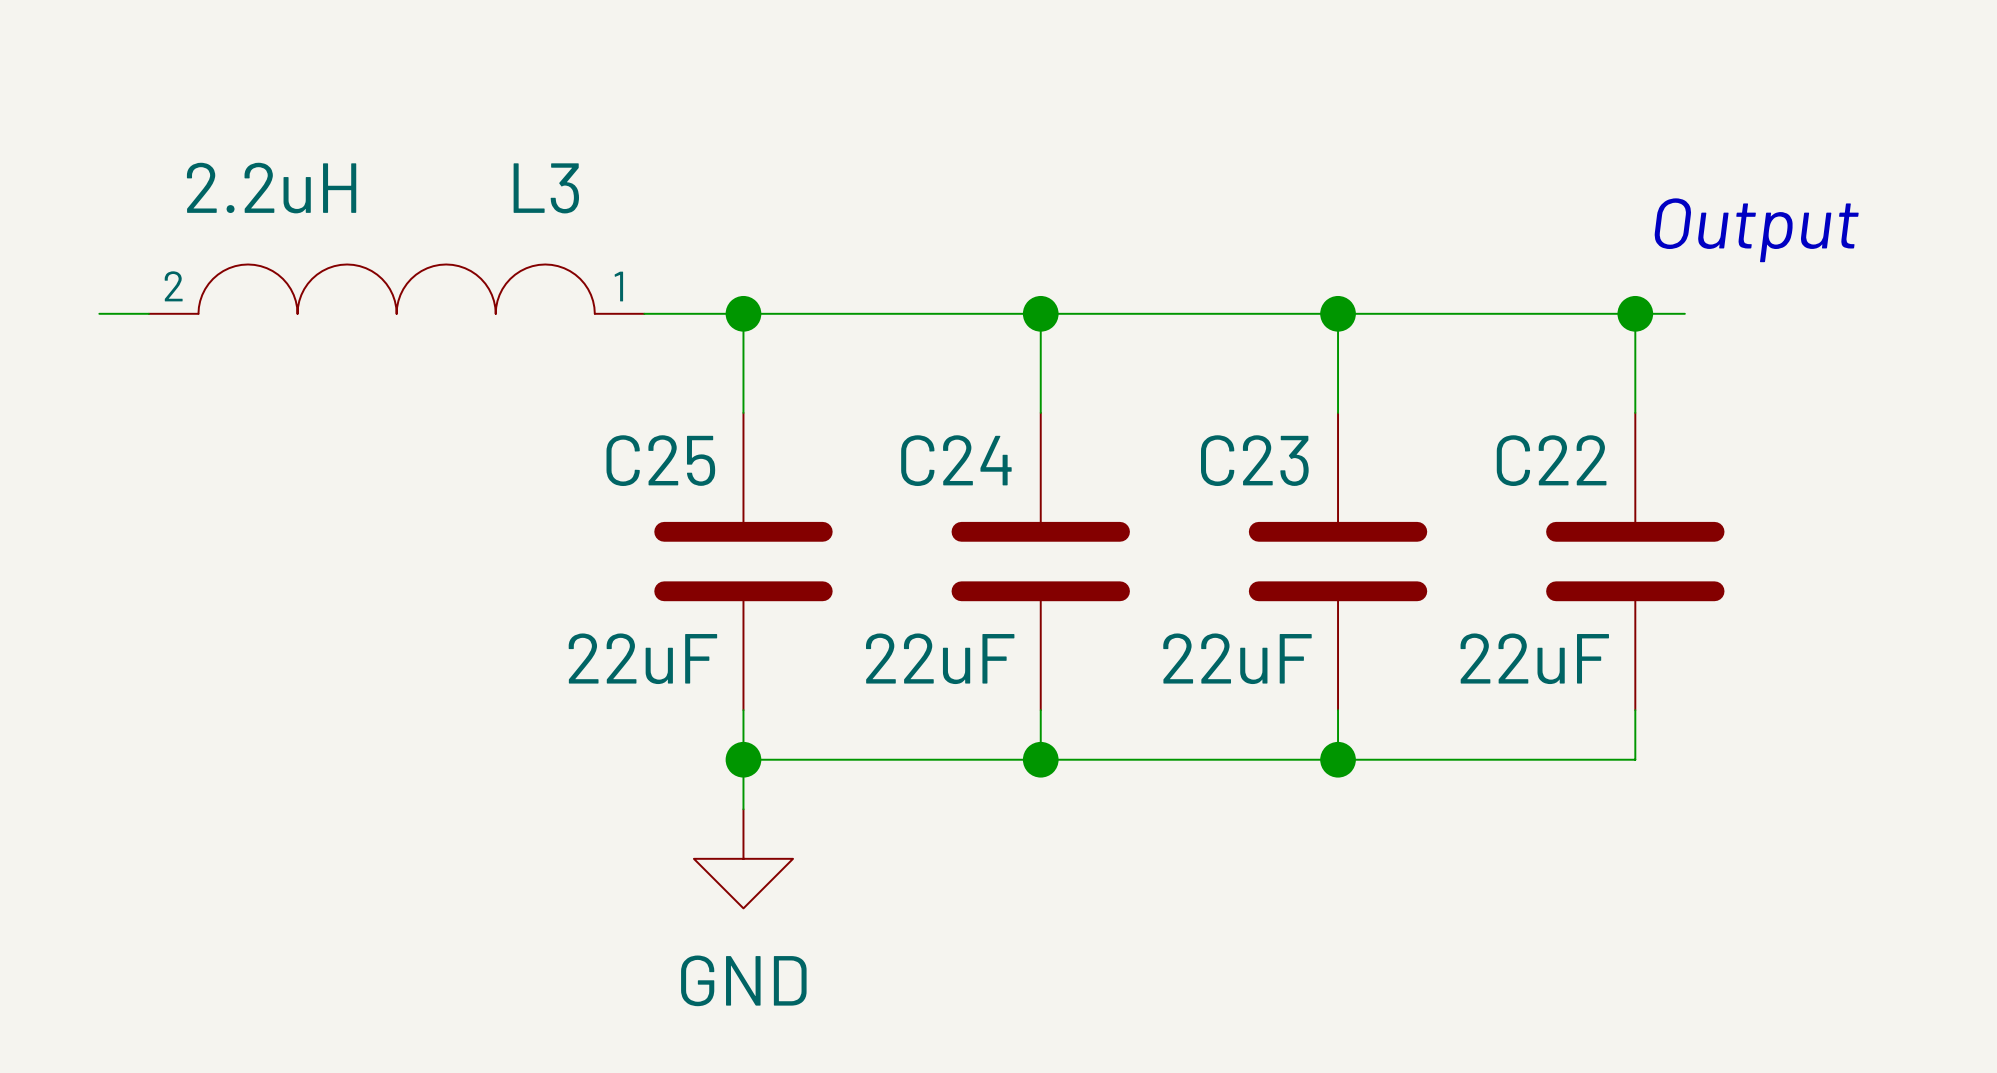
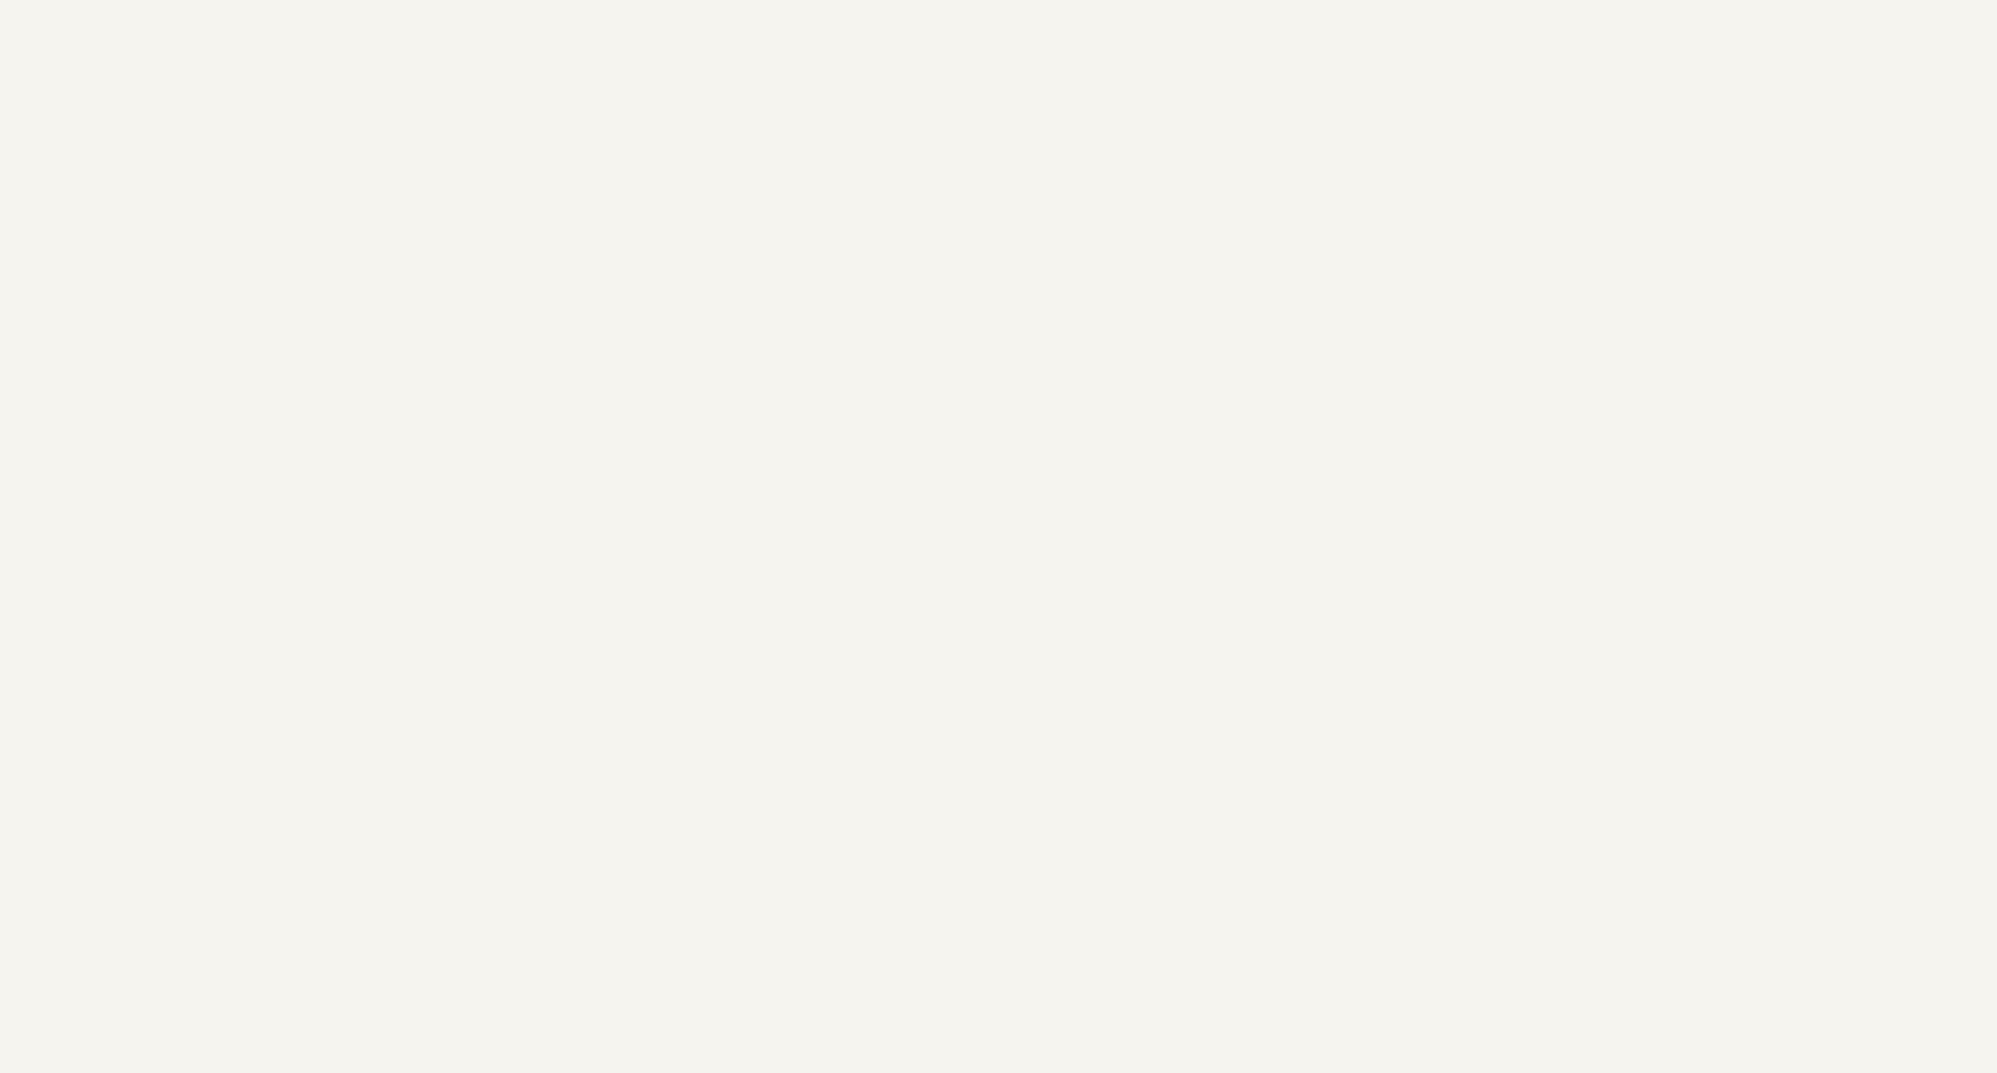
text: Output (1756, 230) -> none
L3: 2.2uH (396, 289) -> none
wire: (99, 313) (148, 313) -> none
wire: (644, 313) (1684, 313) -> none
wire: (743, 313) (743, 412) -> none
junction: (743, 313) -> none
wire: (1040, 313) (1040, 412) -> none
junction: (1040, 313) -> none
wire: (1338, 313) (1338, 412) -> none
junction: (1338, 313) -> none
wire: (1635, 313) (1635, 412) -> none
junction: (1635, 313) -> none
C25: 22uF (743, 561) -> none
C24: 22uF (1040, 561) -> none
C23: 22uF (1338, 561) -> none
C22: 22uF (1635, 561) -> none
wire: (743, 710) (743, 809) -> none
wire: (1040, 710) (1040, 759) -> none
wire: (1338, 710) (1338, 759) -> none
wire: (1635, 710) (1635, 759) (743, 759) -> none
junction: (743, 759) -> none
junction: (1040, 759) -> none
junction: (1338, 759) -> none
power symbol: GND (743, 858) -> none

